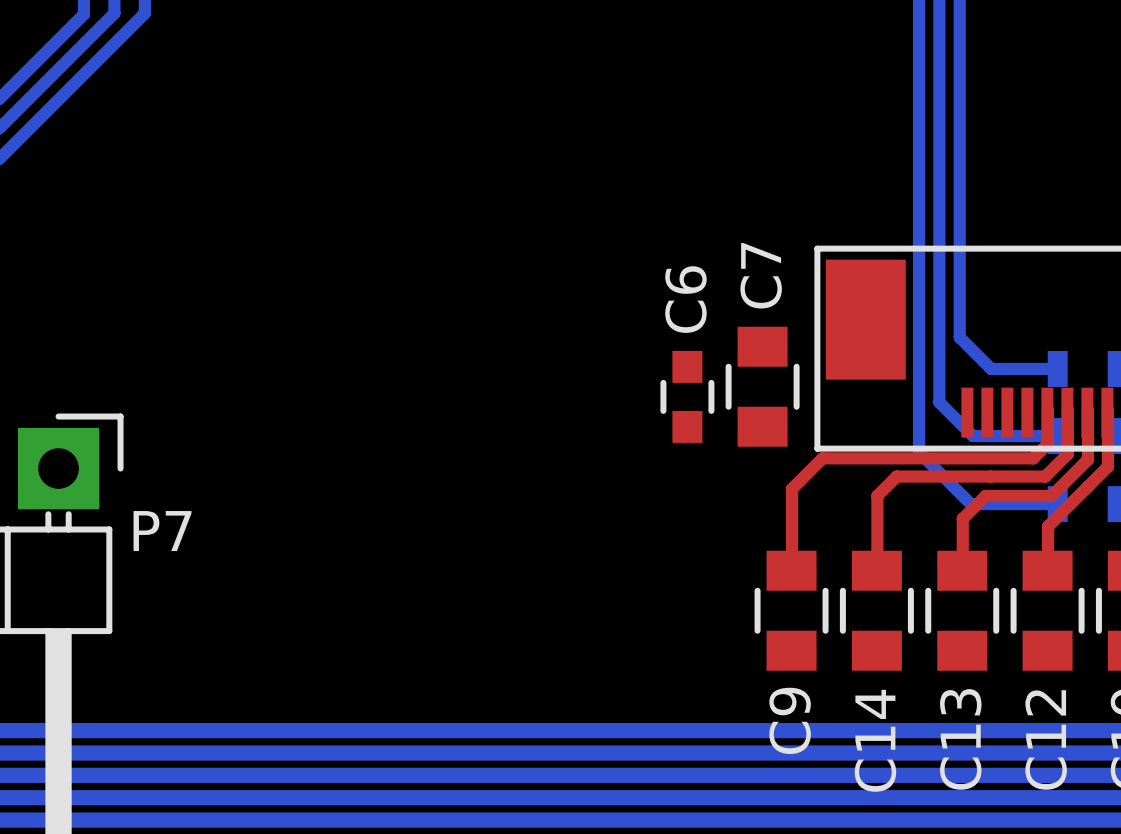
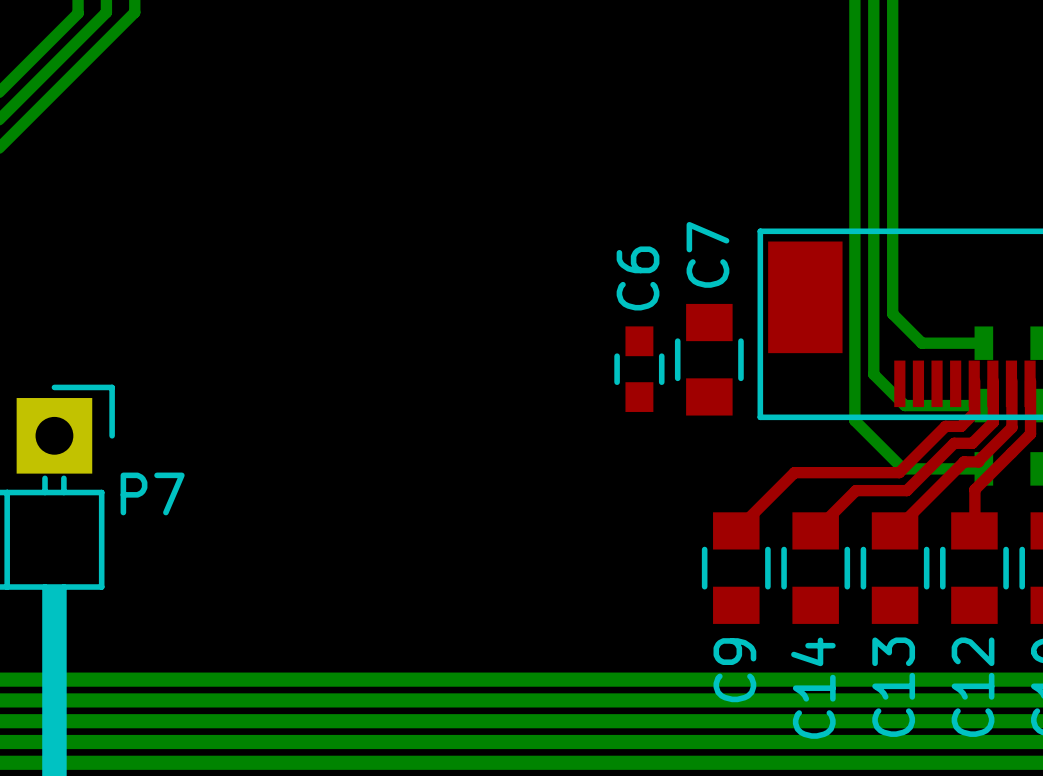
top track: (1016, 458) (822, 458) (792, 488) (792, 572) -> (945, 426) (899, 472) (794, 472) (736, 530)
top track: (1025, 476) (896, 476) (877, 495) (877, 572) -> (954, 443) (906, 490) (855, 490) (815, 530)
top track: (1051, 495) (985, 495) (962, 518) (962, 572) -> (978, 461) (964, 461) (895, 530)

